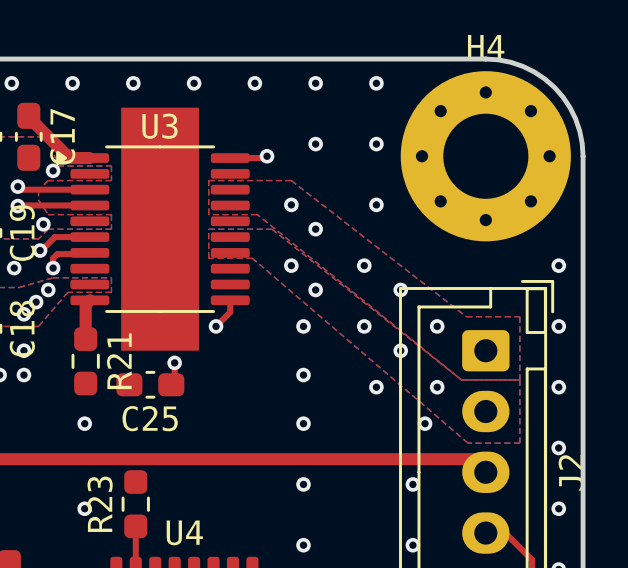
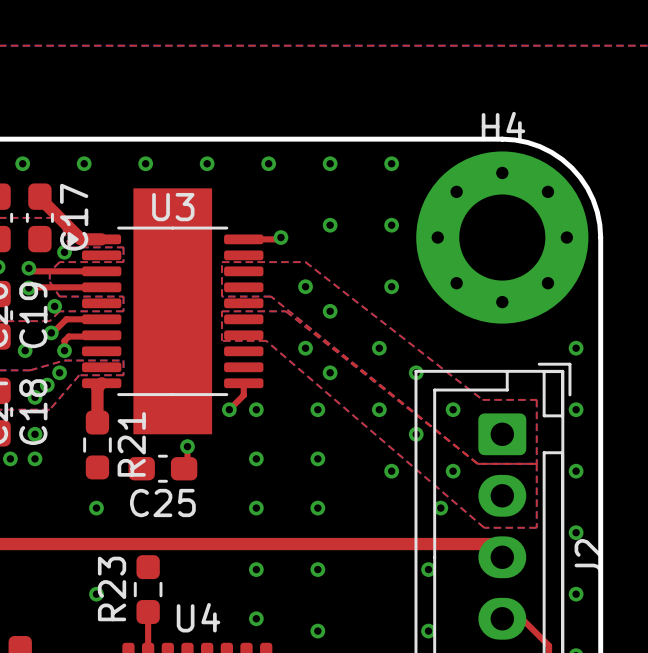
via: none -> (256, 409)
via: none -> (256, 458)
via: none -> (256, 508)
via: none -> (256, 569)
via: none -> (256, 618)

